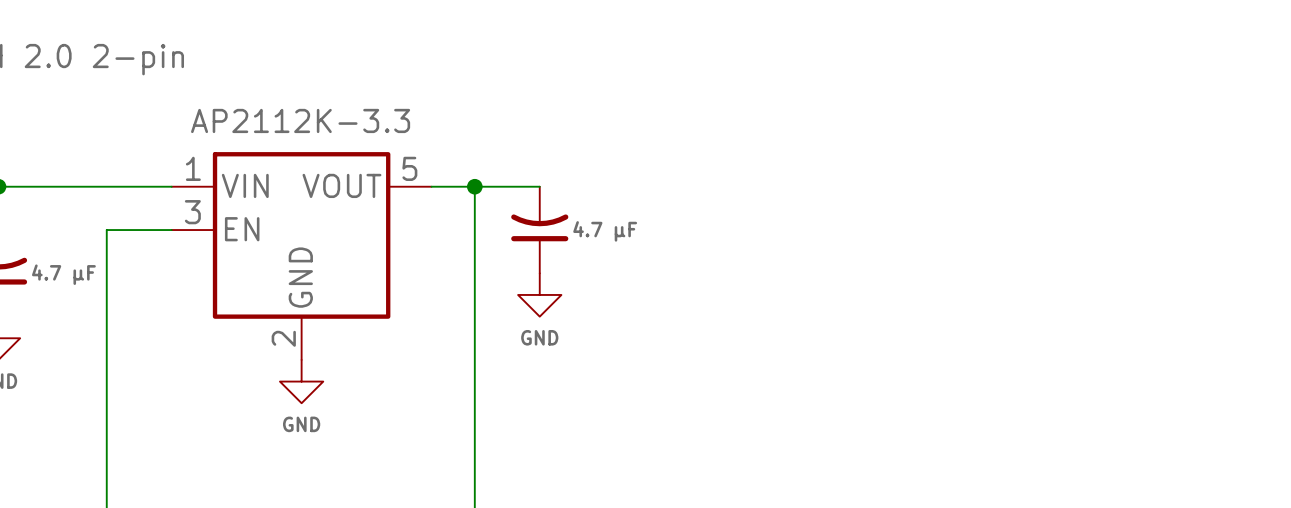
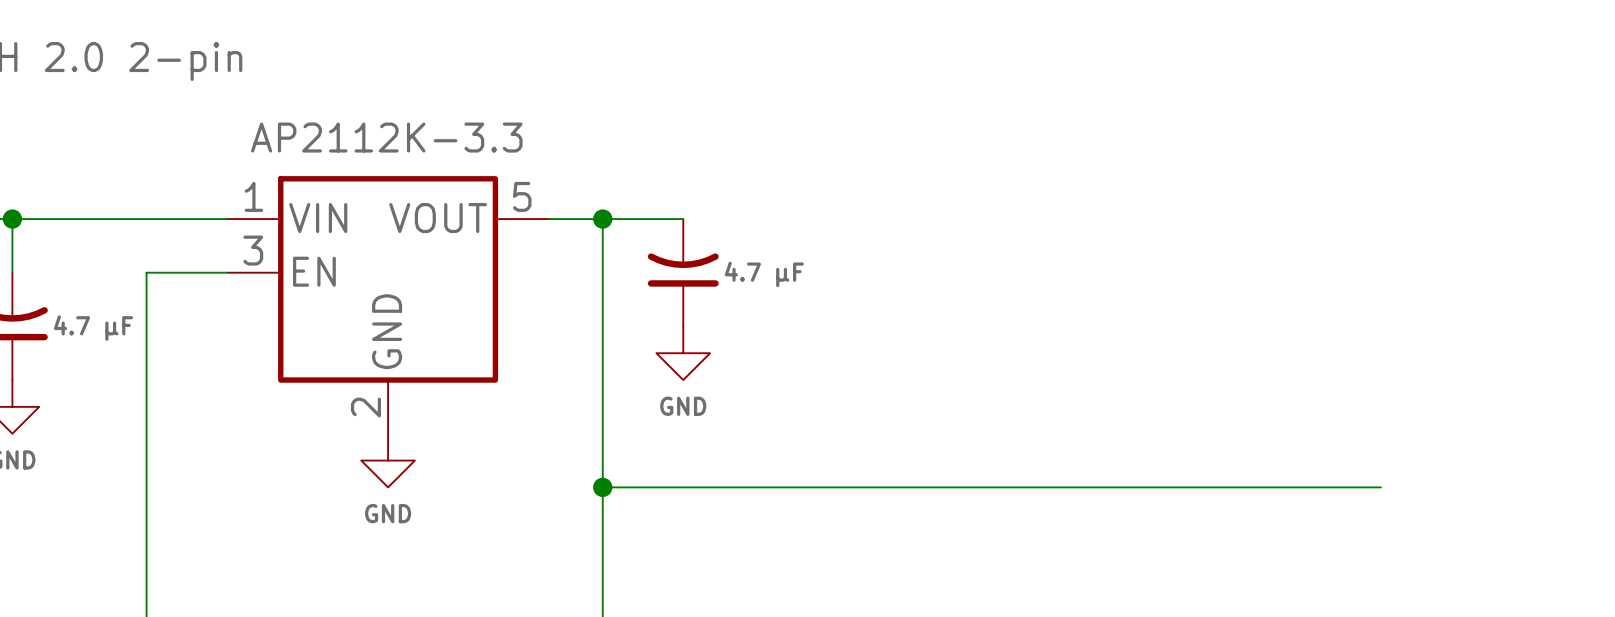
wire: none -> (602, 487) (1380, 487)
junction: none -> (602, 487)

